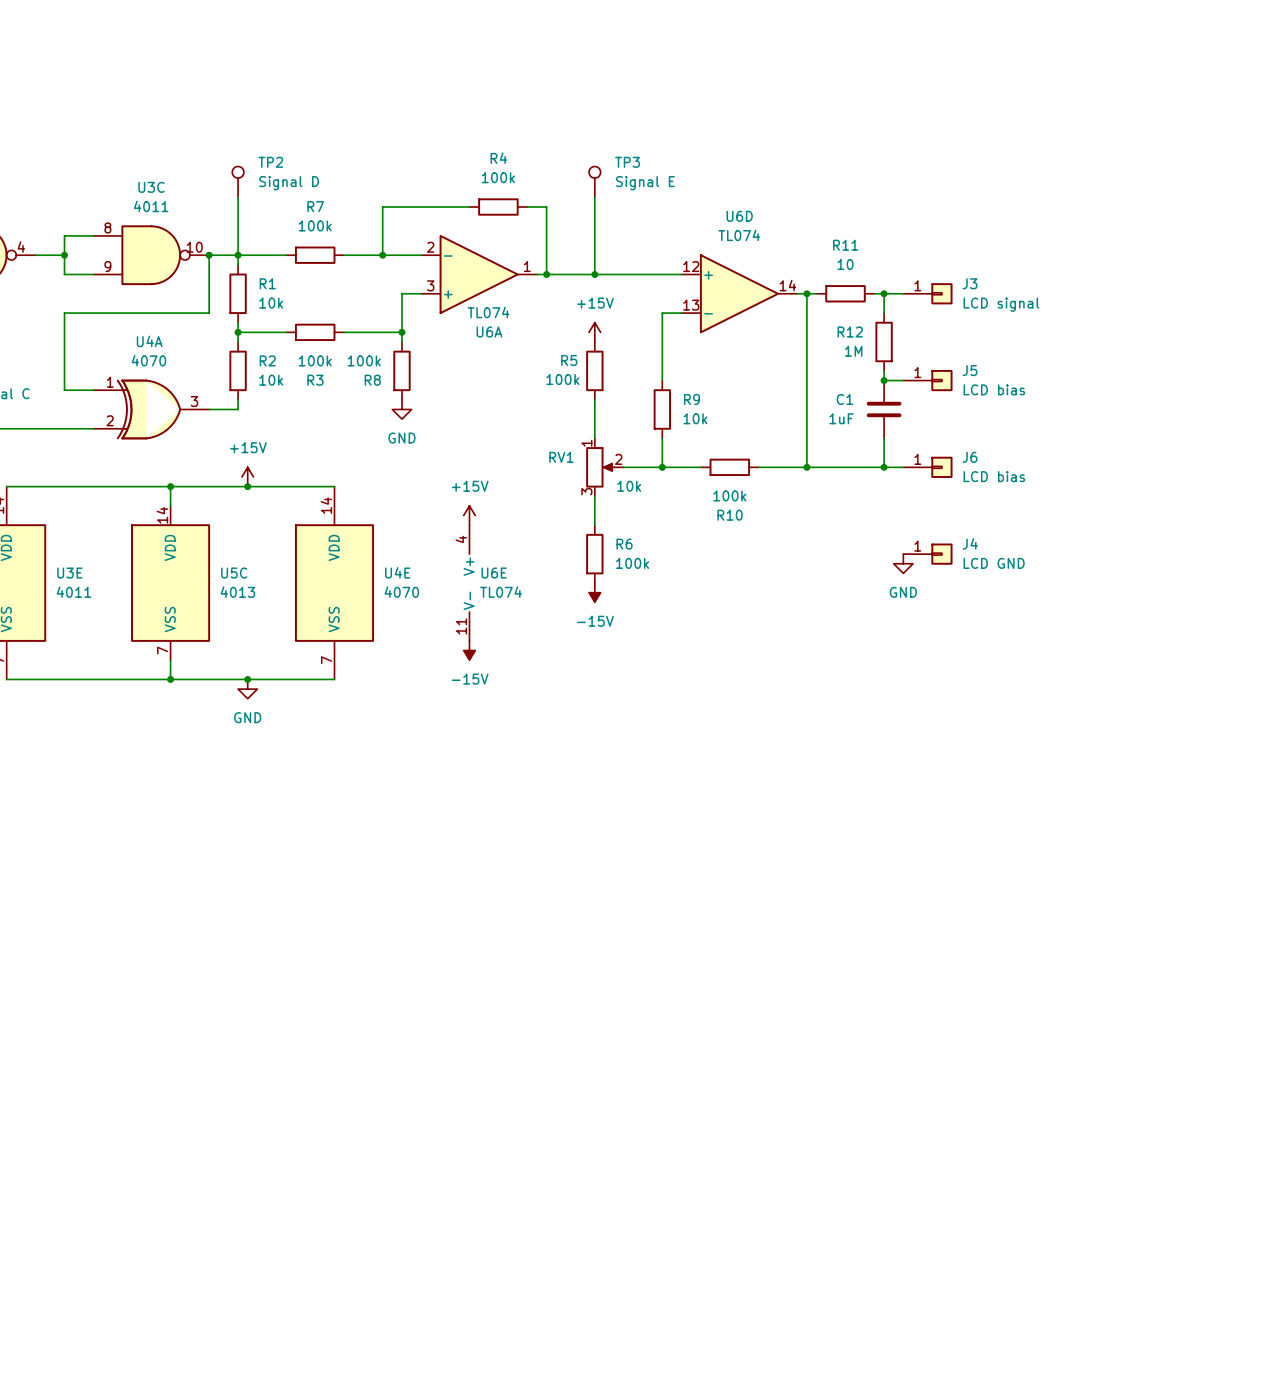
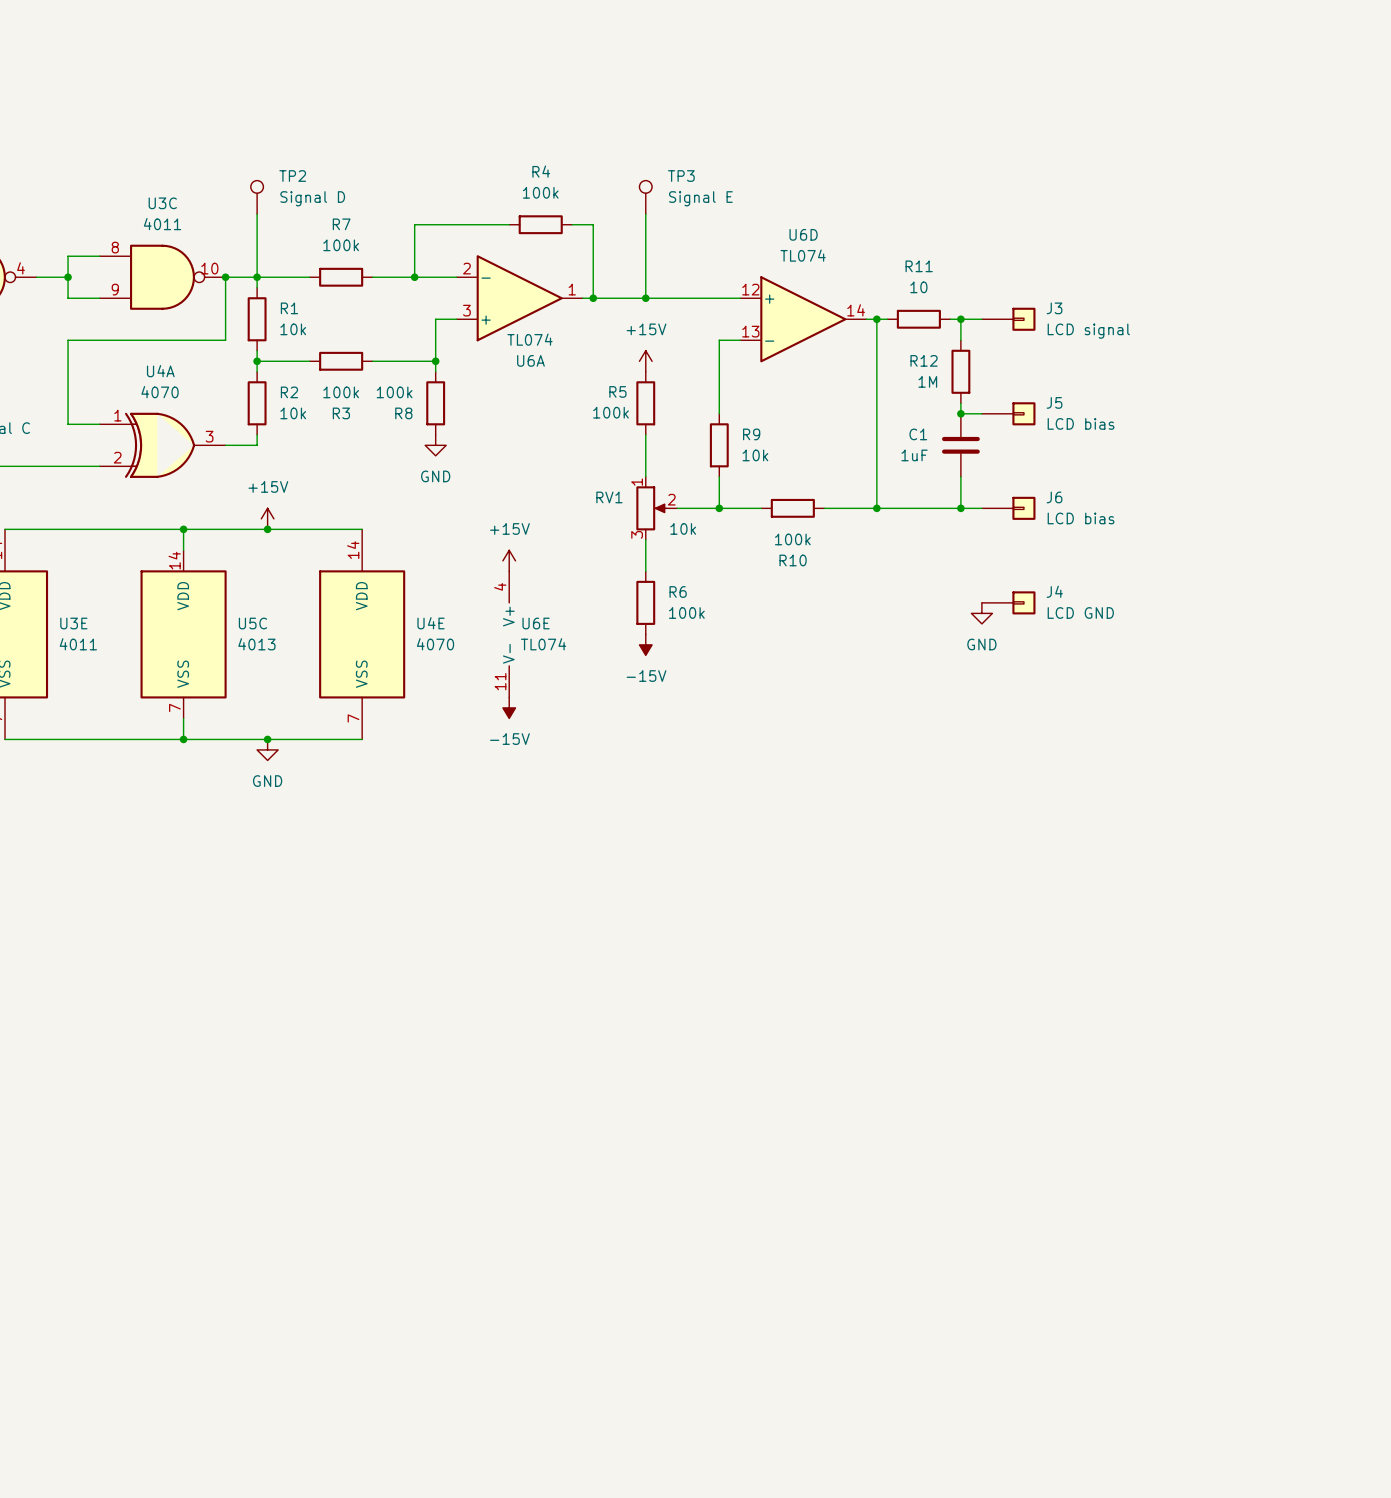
J3 pin number: 1 (917, 285) -> none
J5 pin number: 1 (917, 372) -> none
J6 pin number: 1 (917, 459) -> none
J4 pin number: 1 (917, 546) -> none

